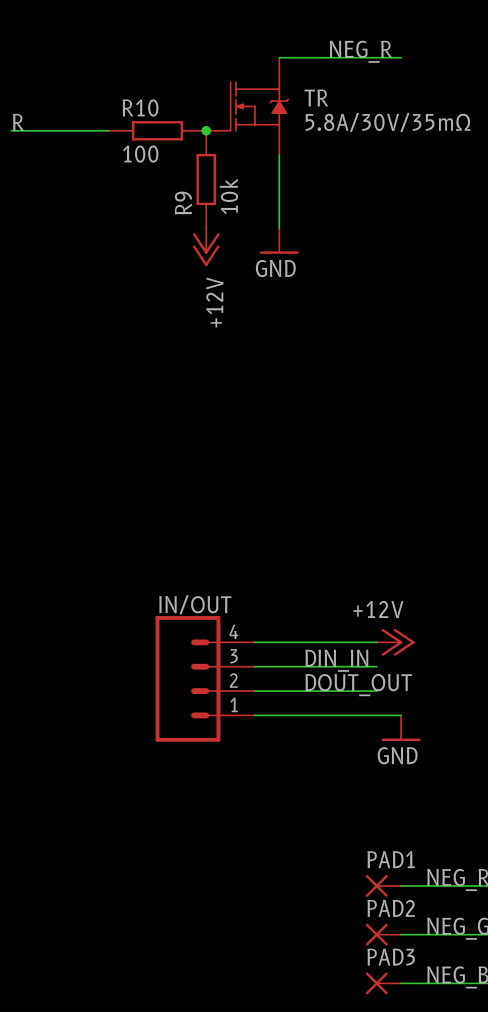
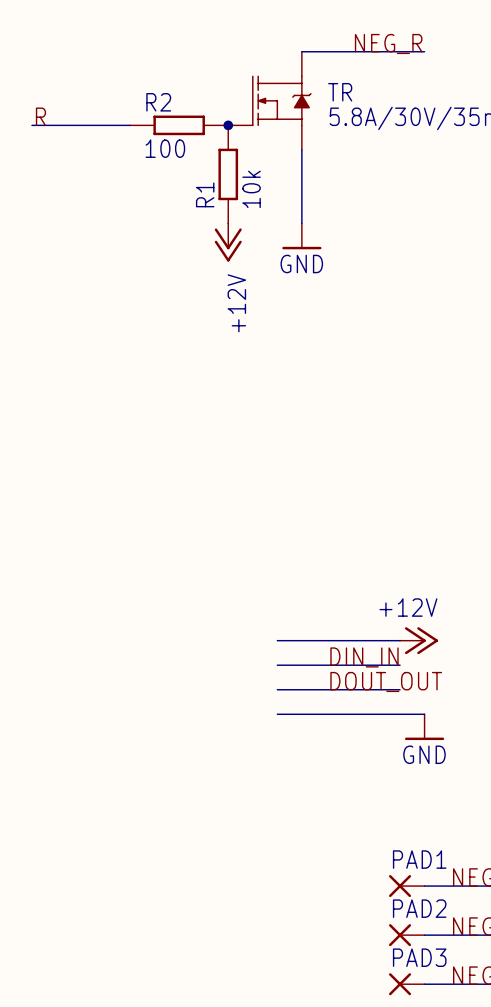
R10 name: R10 (140, 107) -> R2 (158, 102)
R9 name: R9 (183, 203) -> R1 (205, 194)
IN/OUT: (205, 678) -> none

